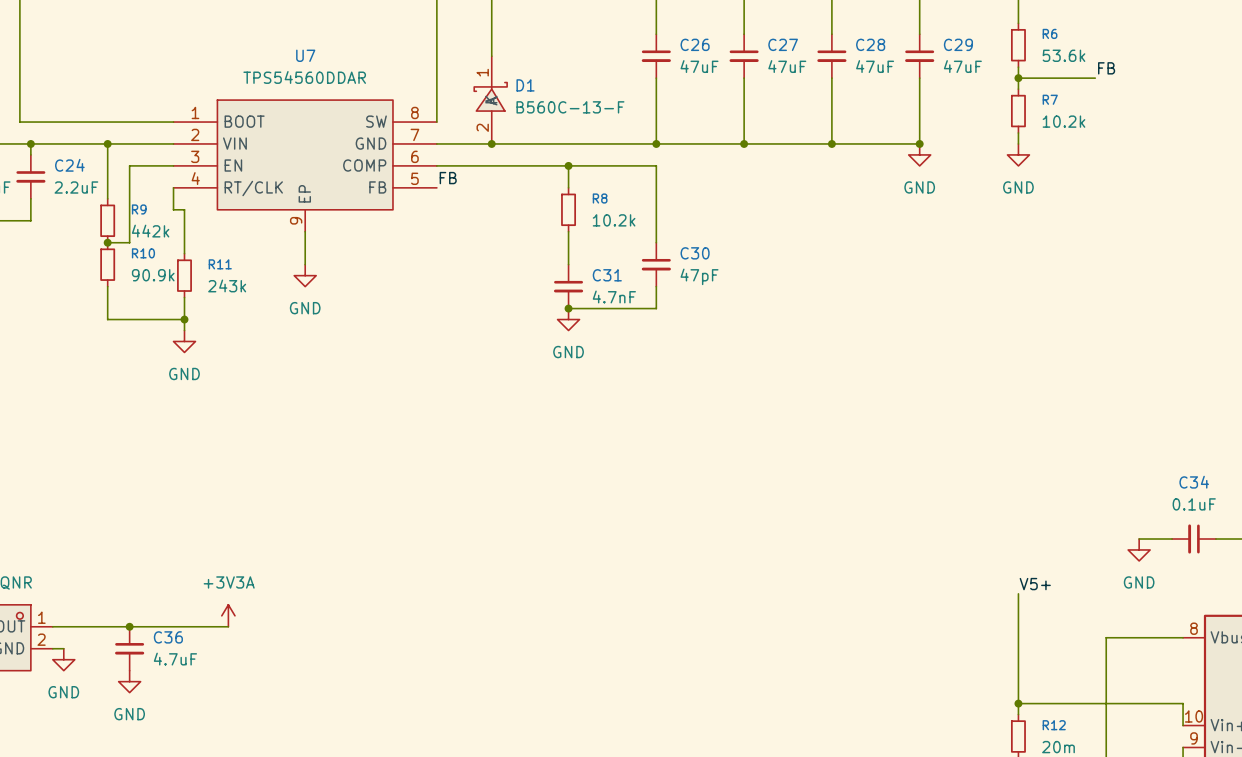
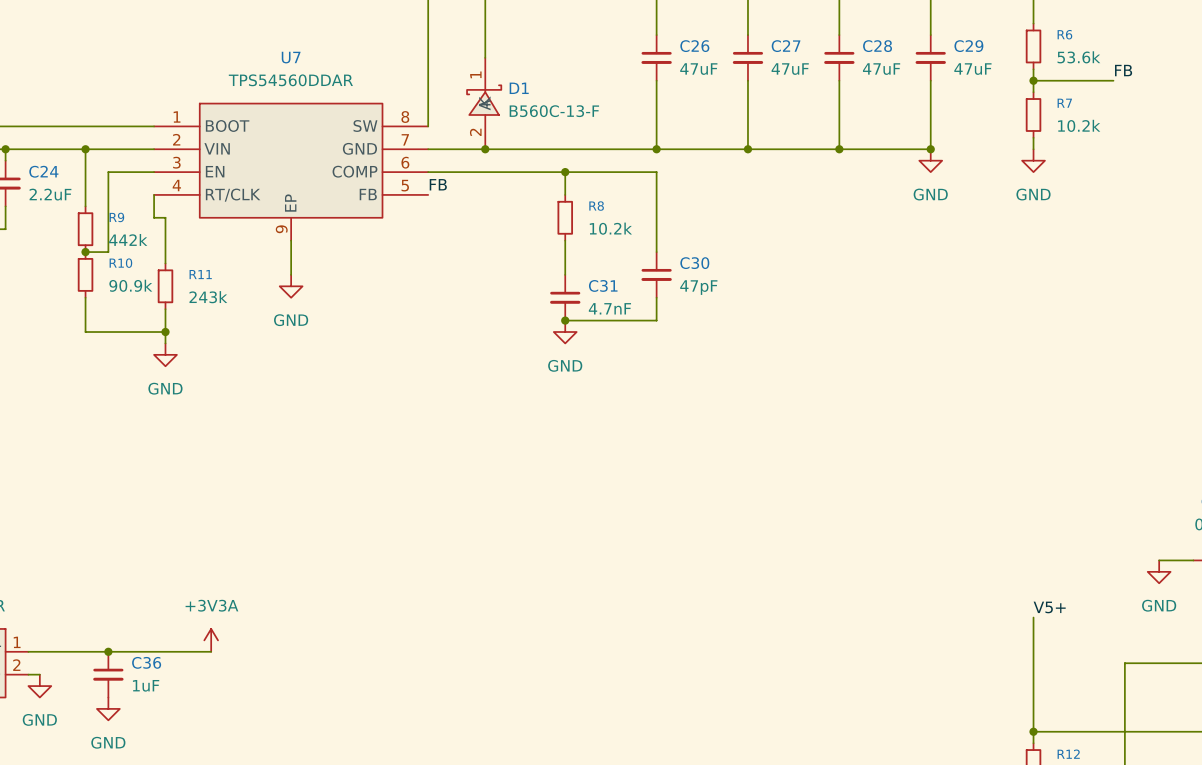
C36 value: 4.7uF (175, 659) -> 1uF (146, 685)

